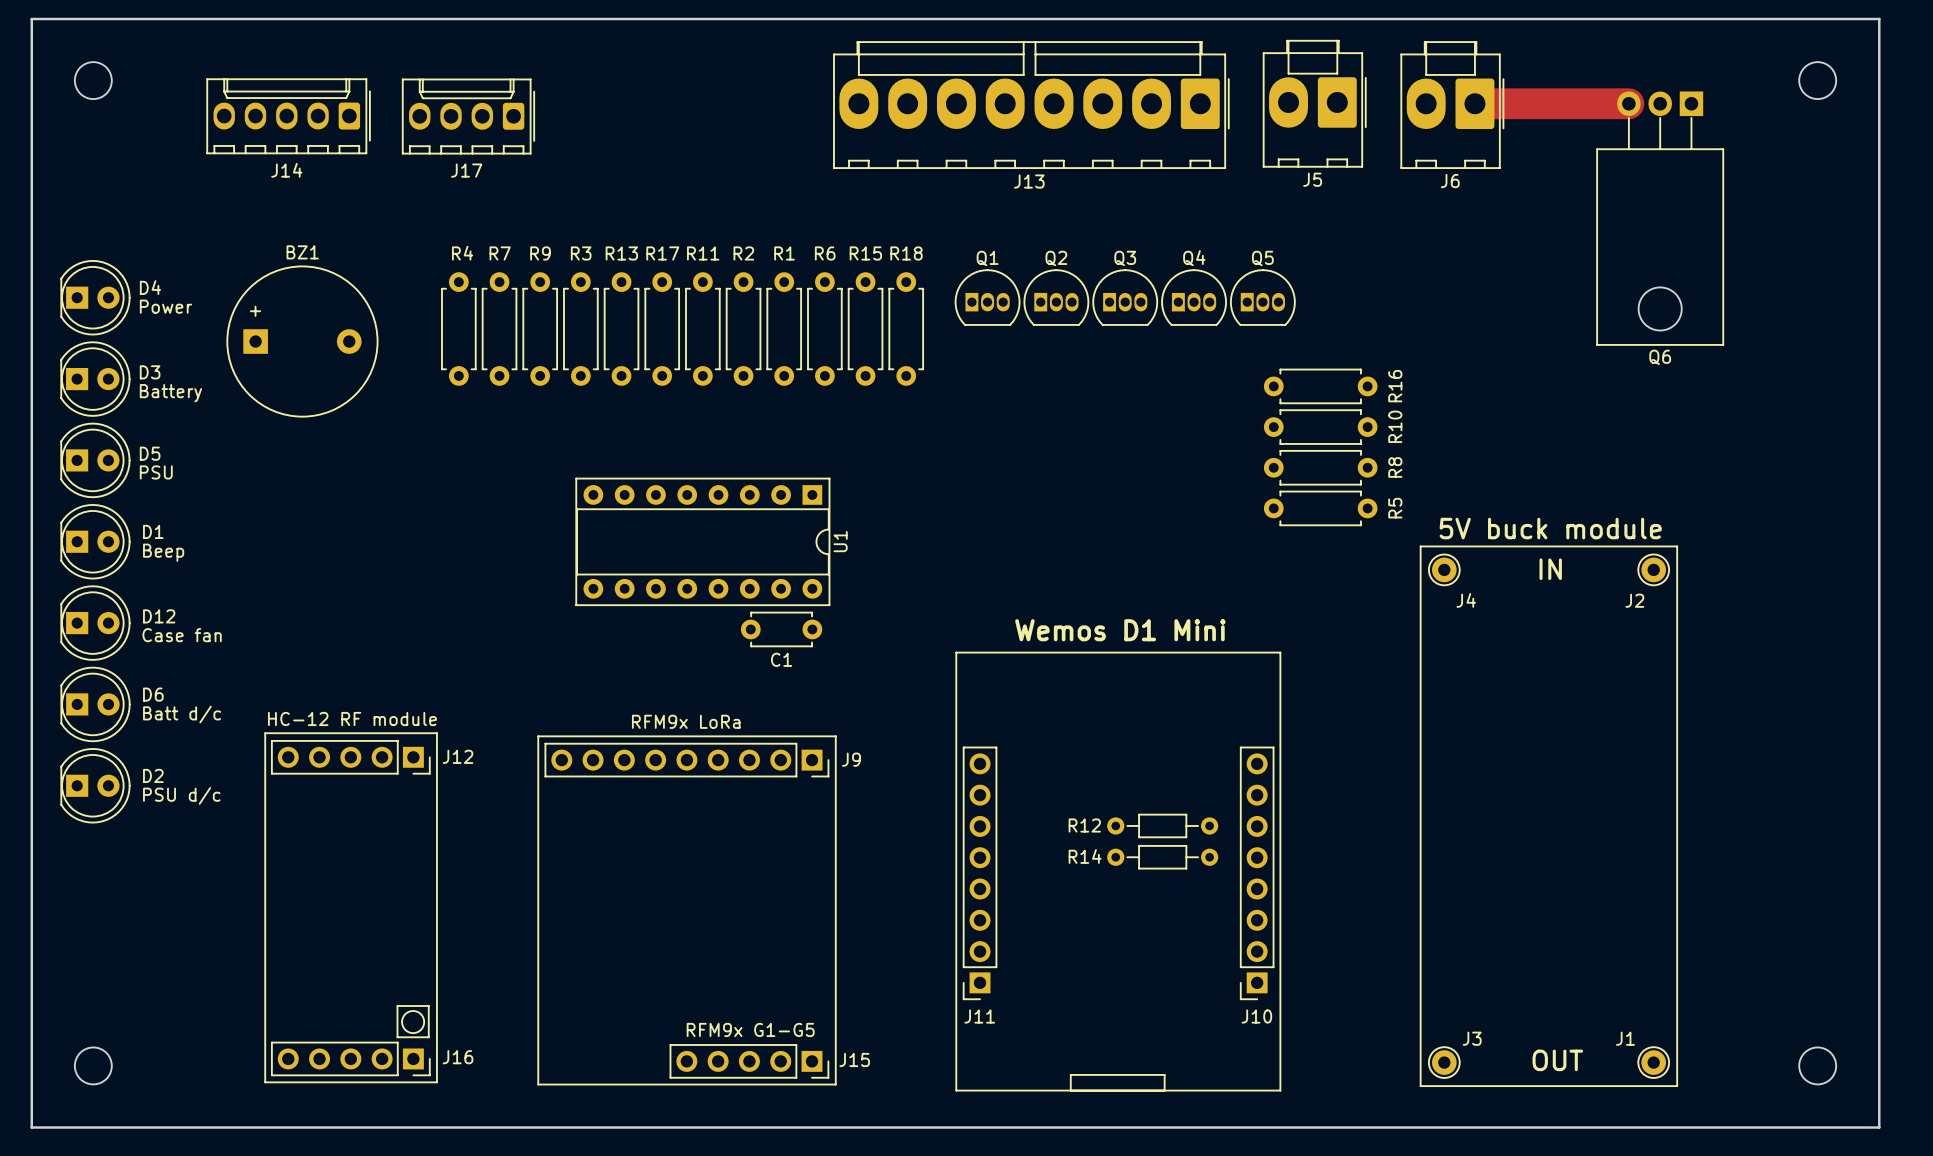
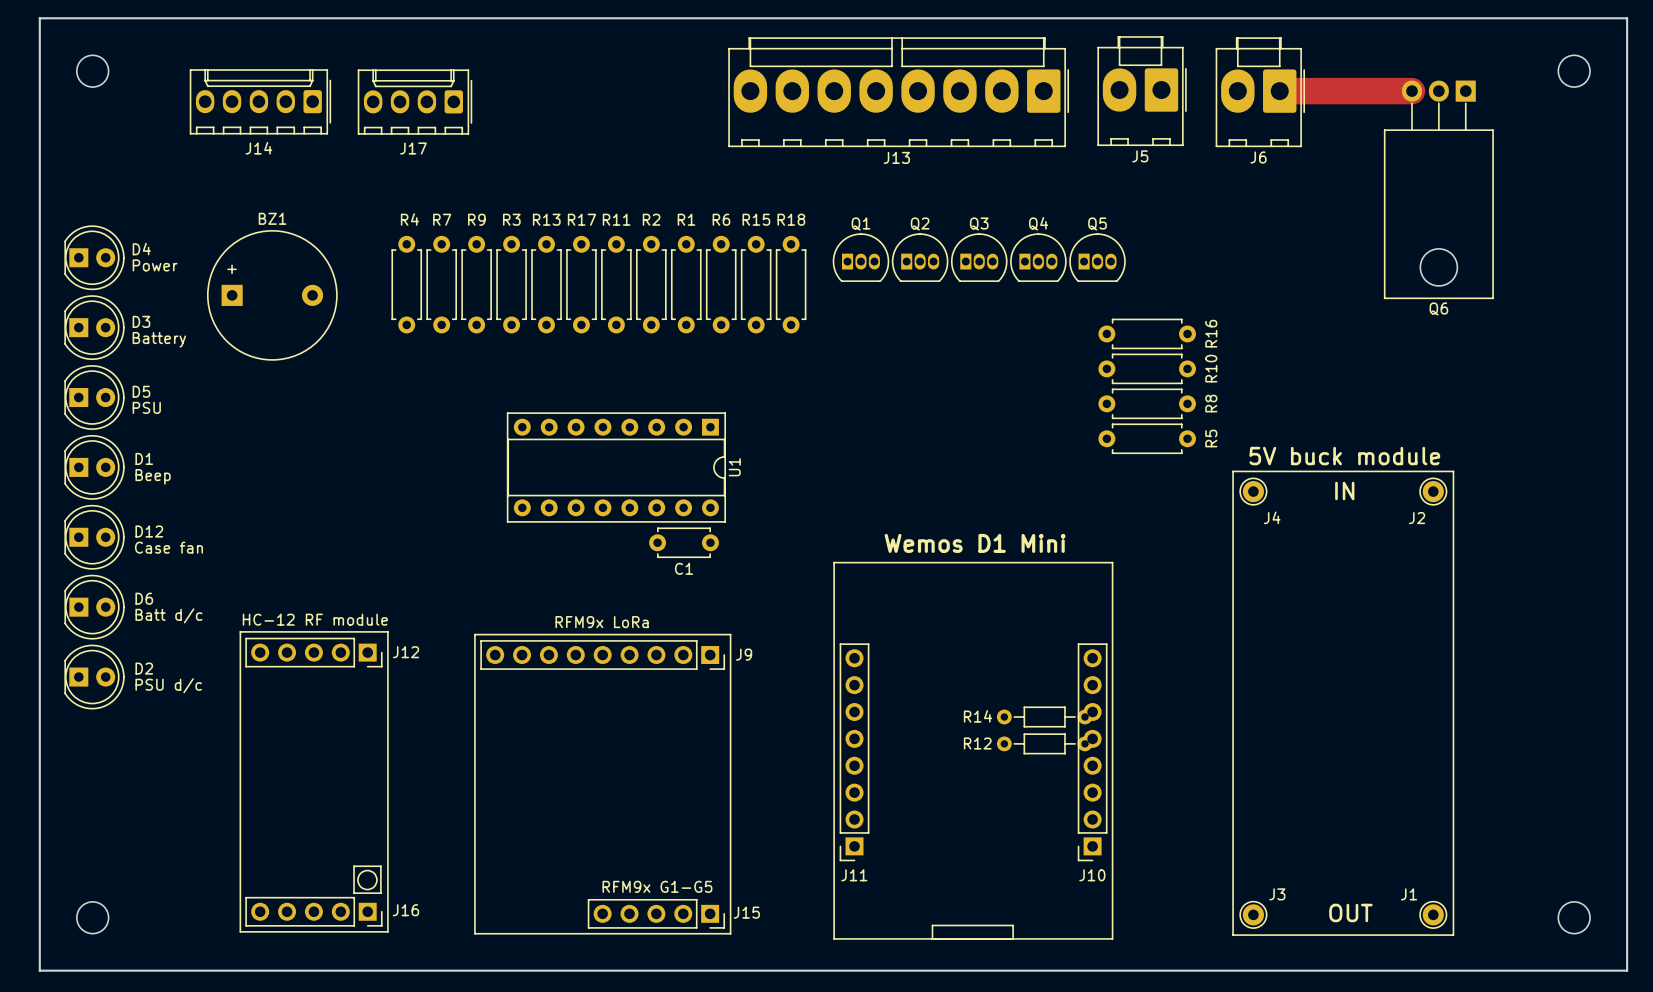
R12 position: (1162, 825) -> (1044, 743)
R14 position: (1162, 857) -> (1044, 717)

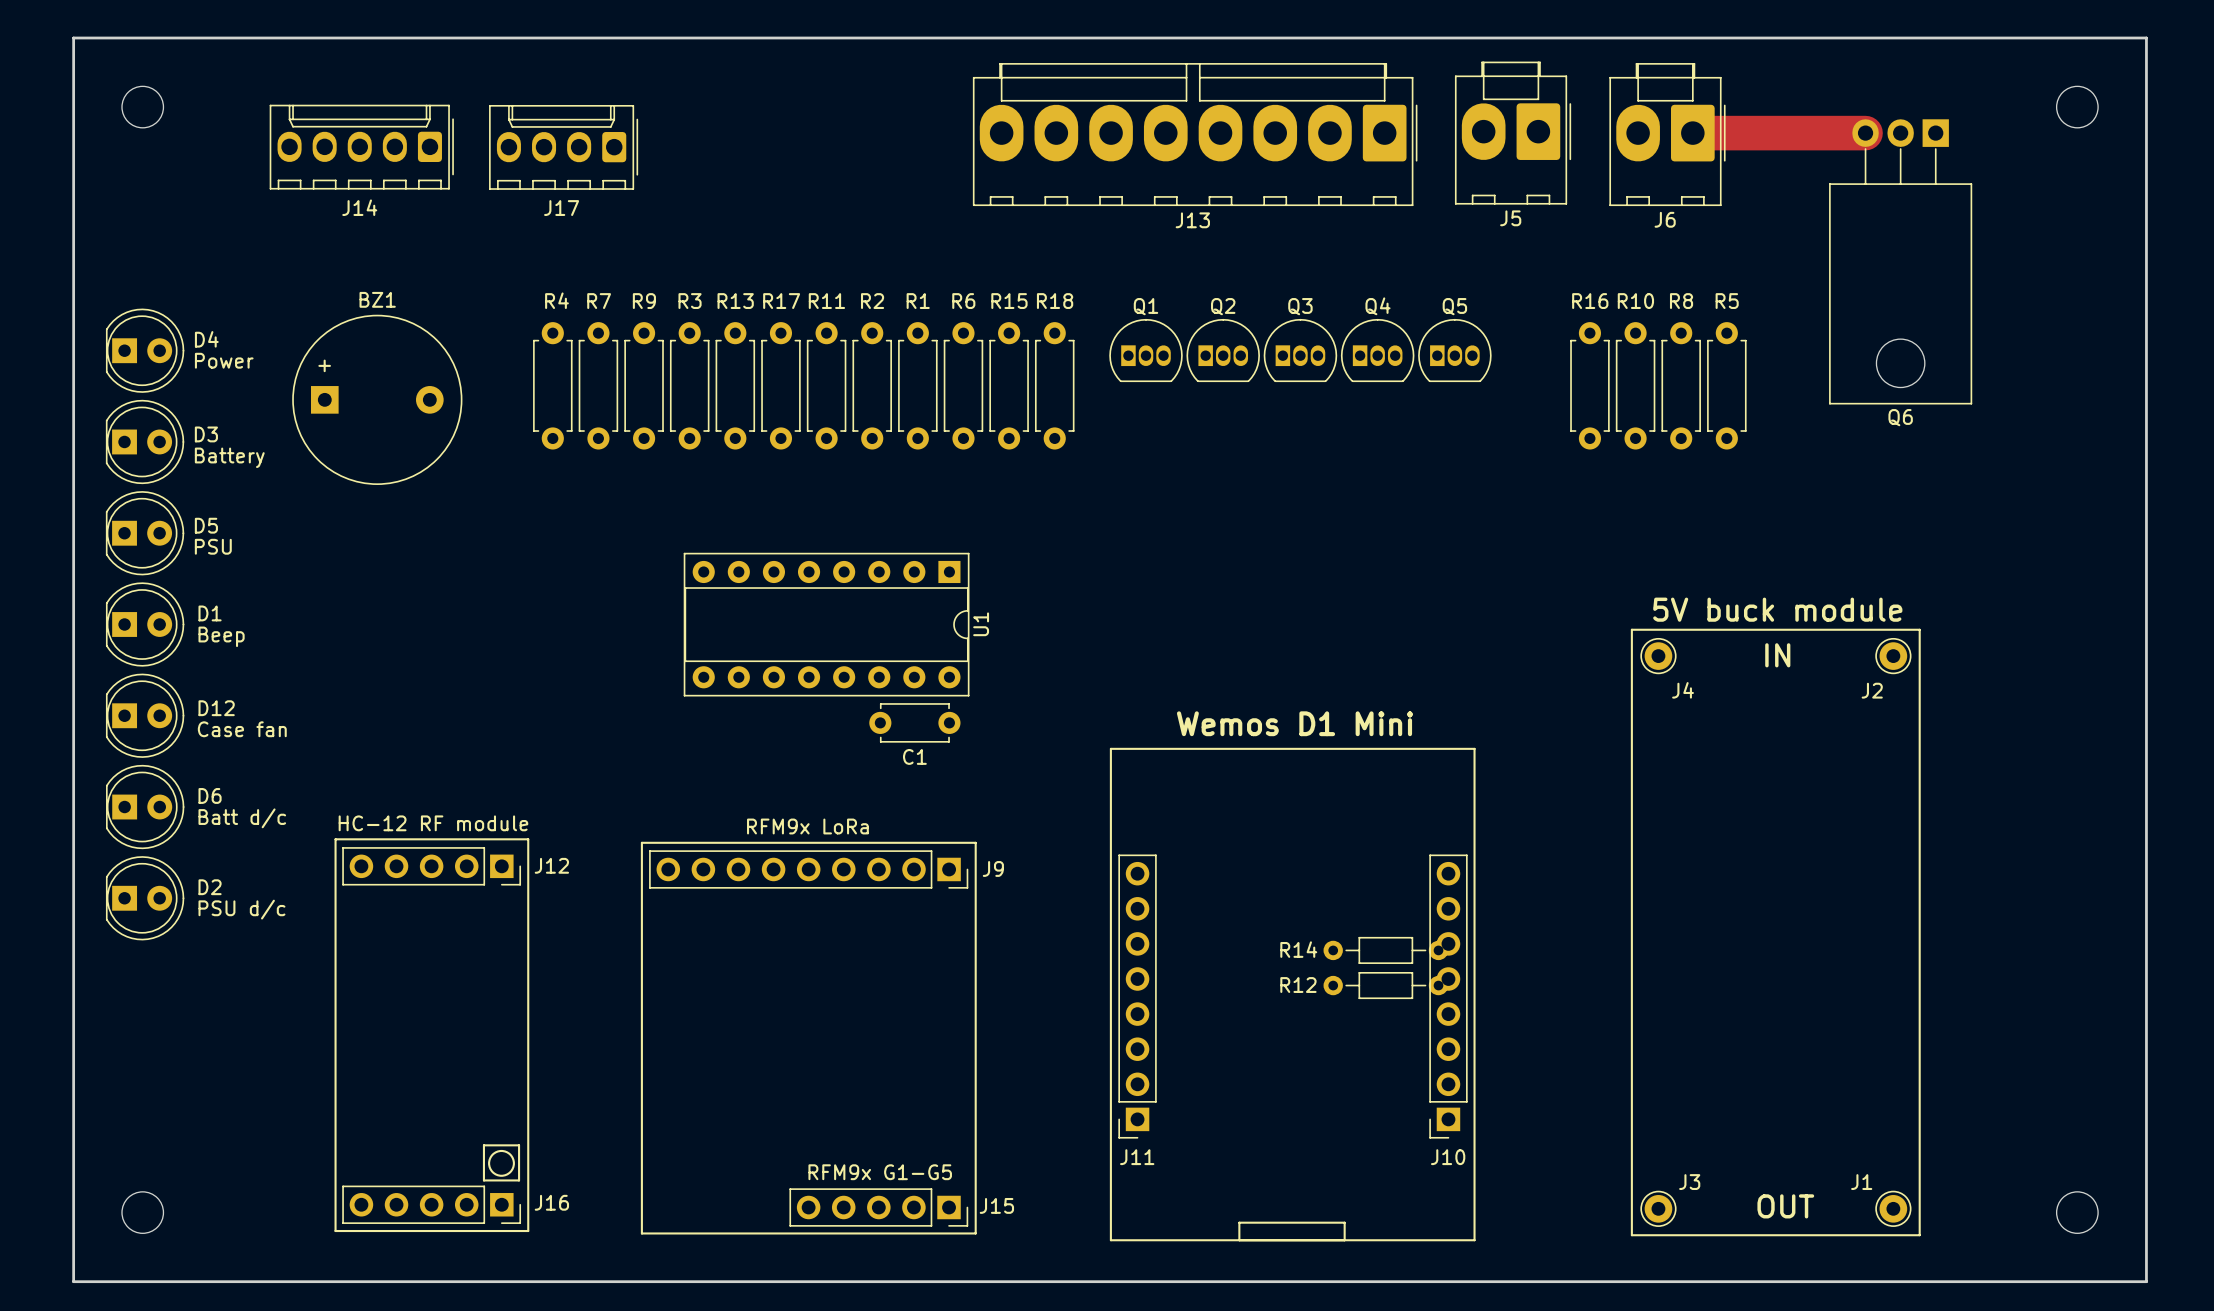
R16 rotation: 0° (1147, 333) -> 90° clockwise (1589, 385)
R16 position: (1147, 333) -> (1589, 385)
R16 name position: R16 (1211, 333) -> R16 (1590, 301)
R10 rotation: 0° (1147, 368) -> 90° clockwise (1635, 385)
R10 position: (1147, 368) -> (1635, 385)
R10 name position: R10 (1211, 368) -> R10 (1635, 301)
R8 rotation: 0° (1147, 403) -> 90° clockwise (1681, 385)
R8 position: (1147, 403) -> (1681, 385)
R8 name position: R8 (1211, 403) -> R8 (1681, 301)
R5 rotation: 0° (1147, 438) -> 90° clockwise (1726, 385)
R5 position: (1147, 438) -> (1726, 385)
R5 name position: R5 (1211, 438) -> R5 (1727, 301)

